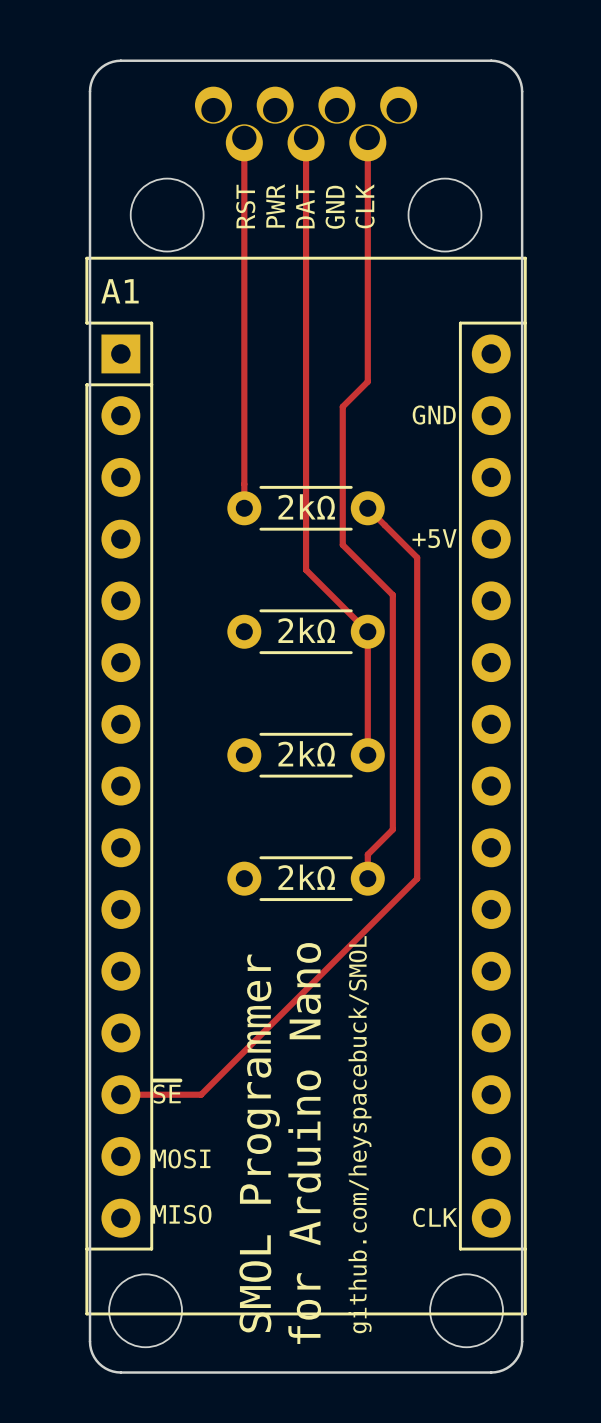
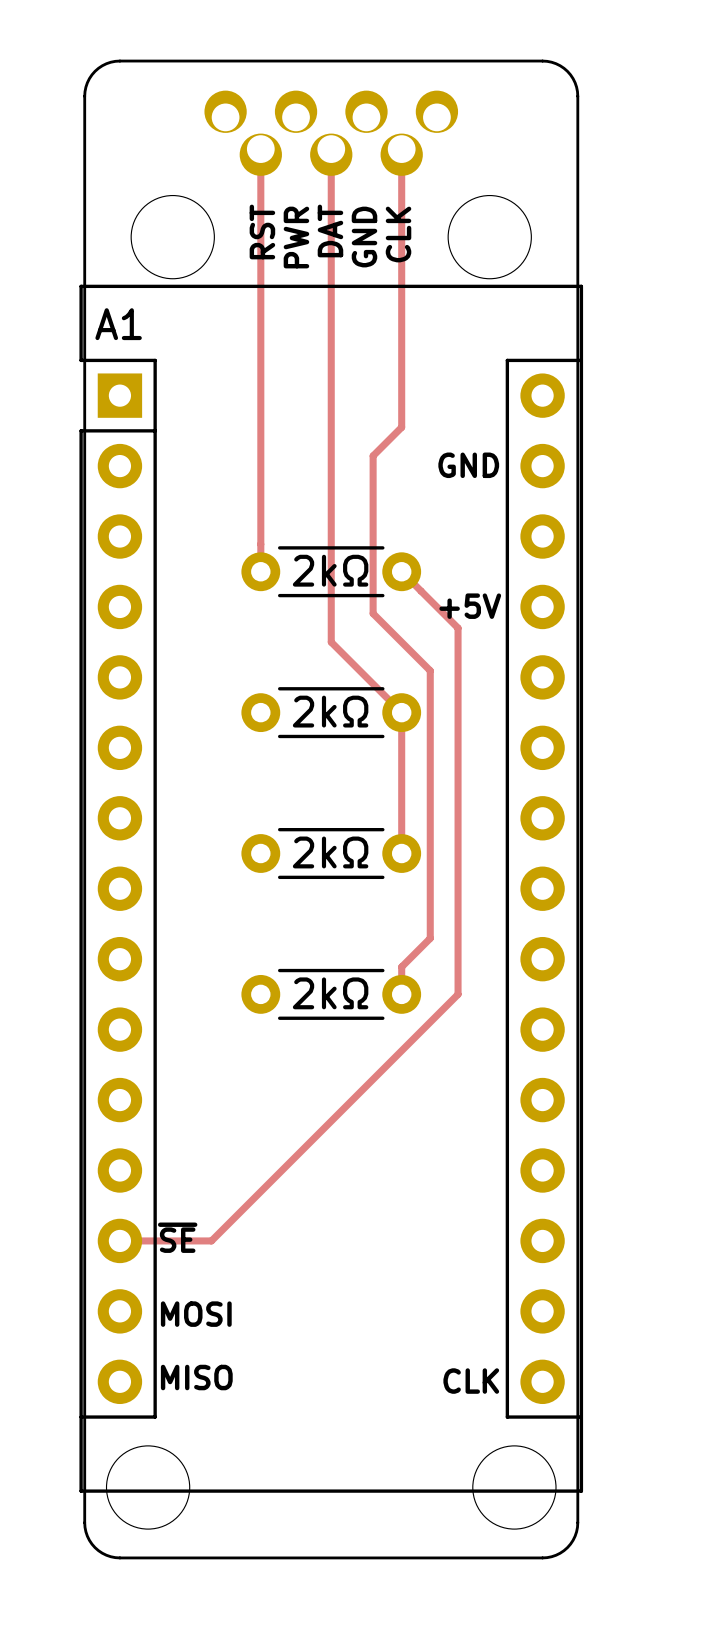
text: github.com/heyspacebuck/SMOL (360, 1134) -> none
text: SMOL Programmer (259, 1143) -> none
text: for Arduino Nano (304, 1143) -> none

